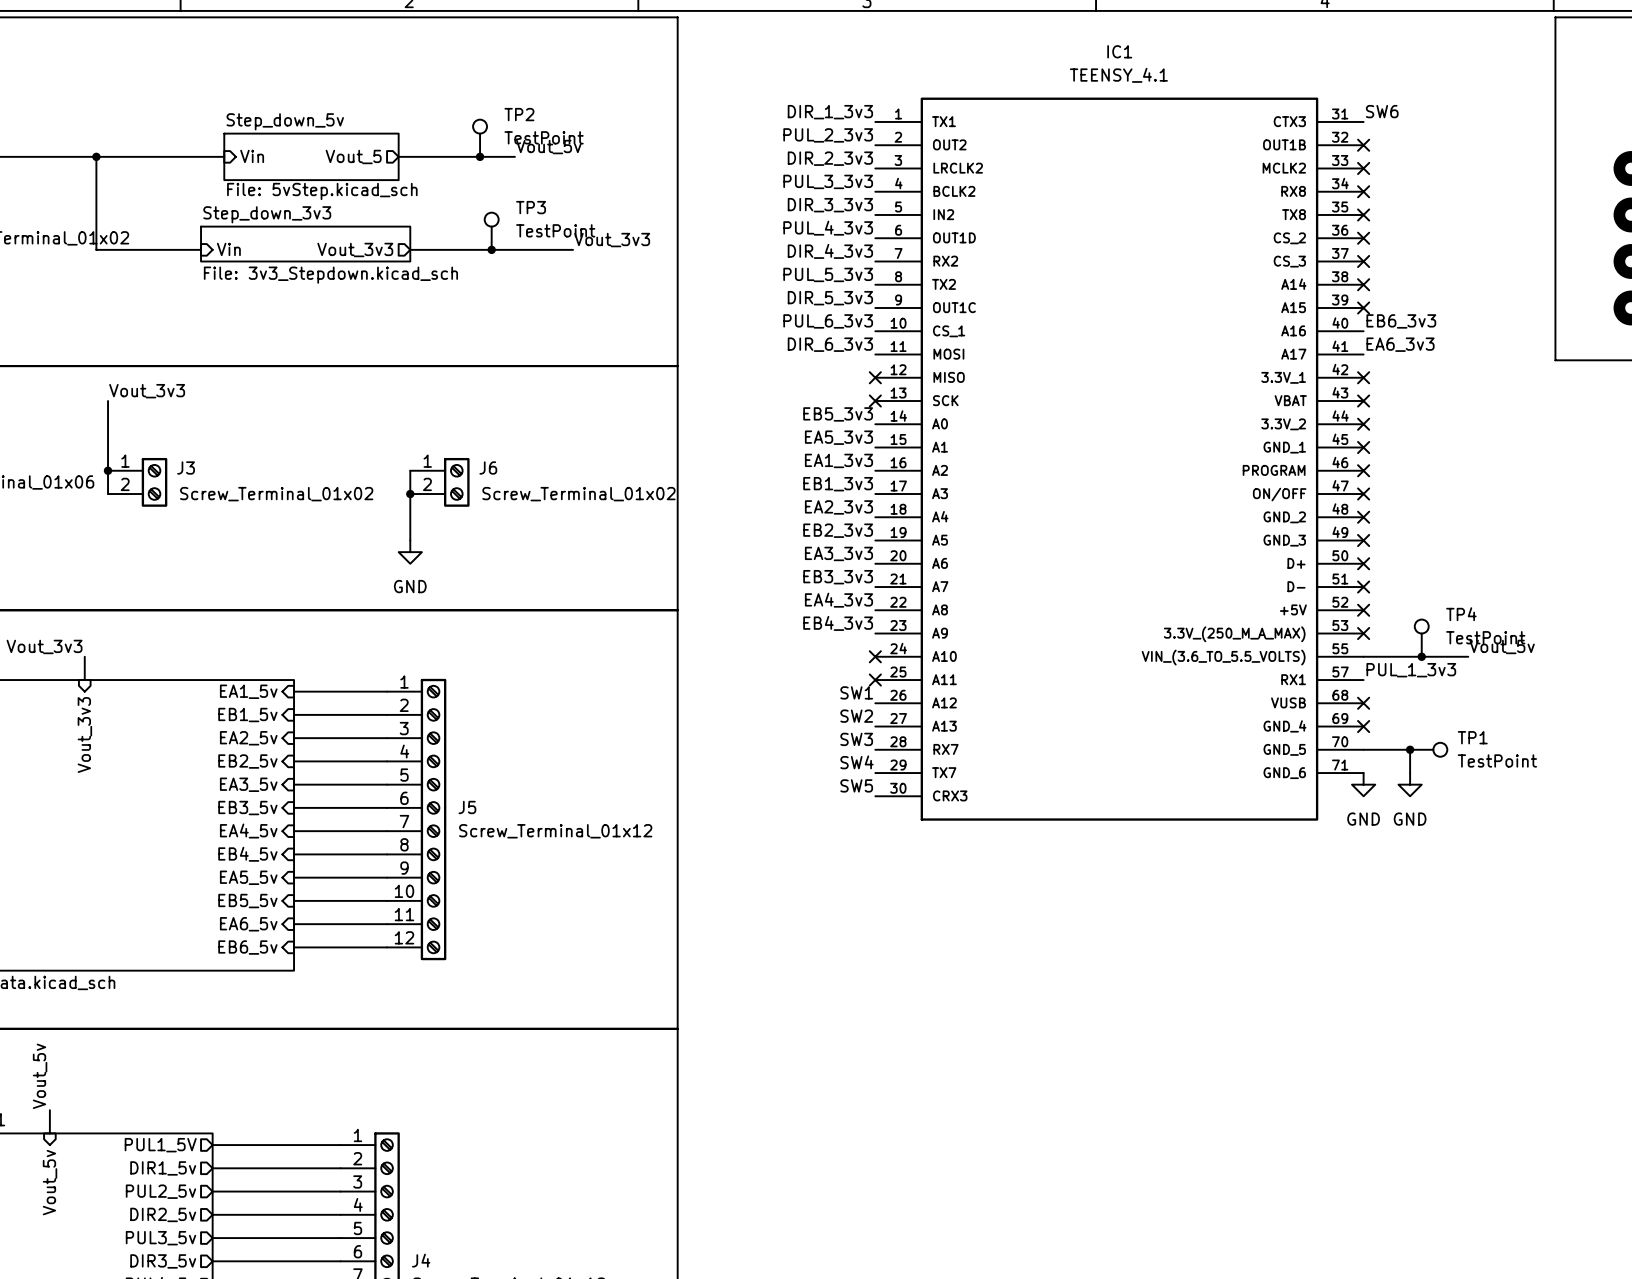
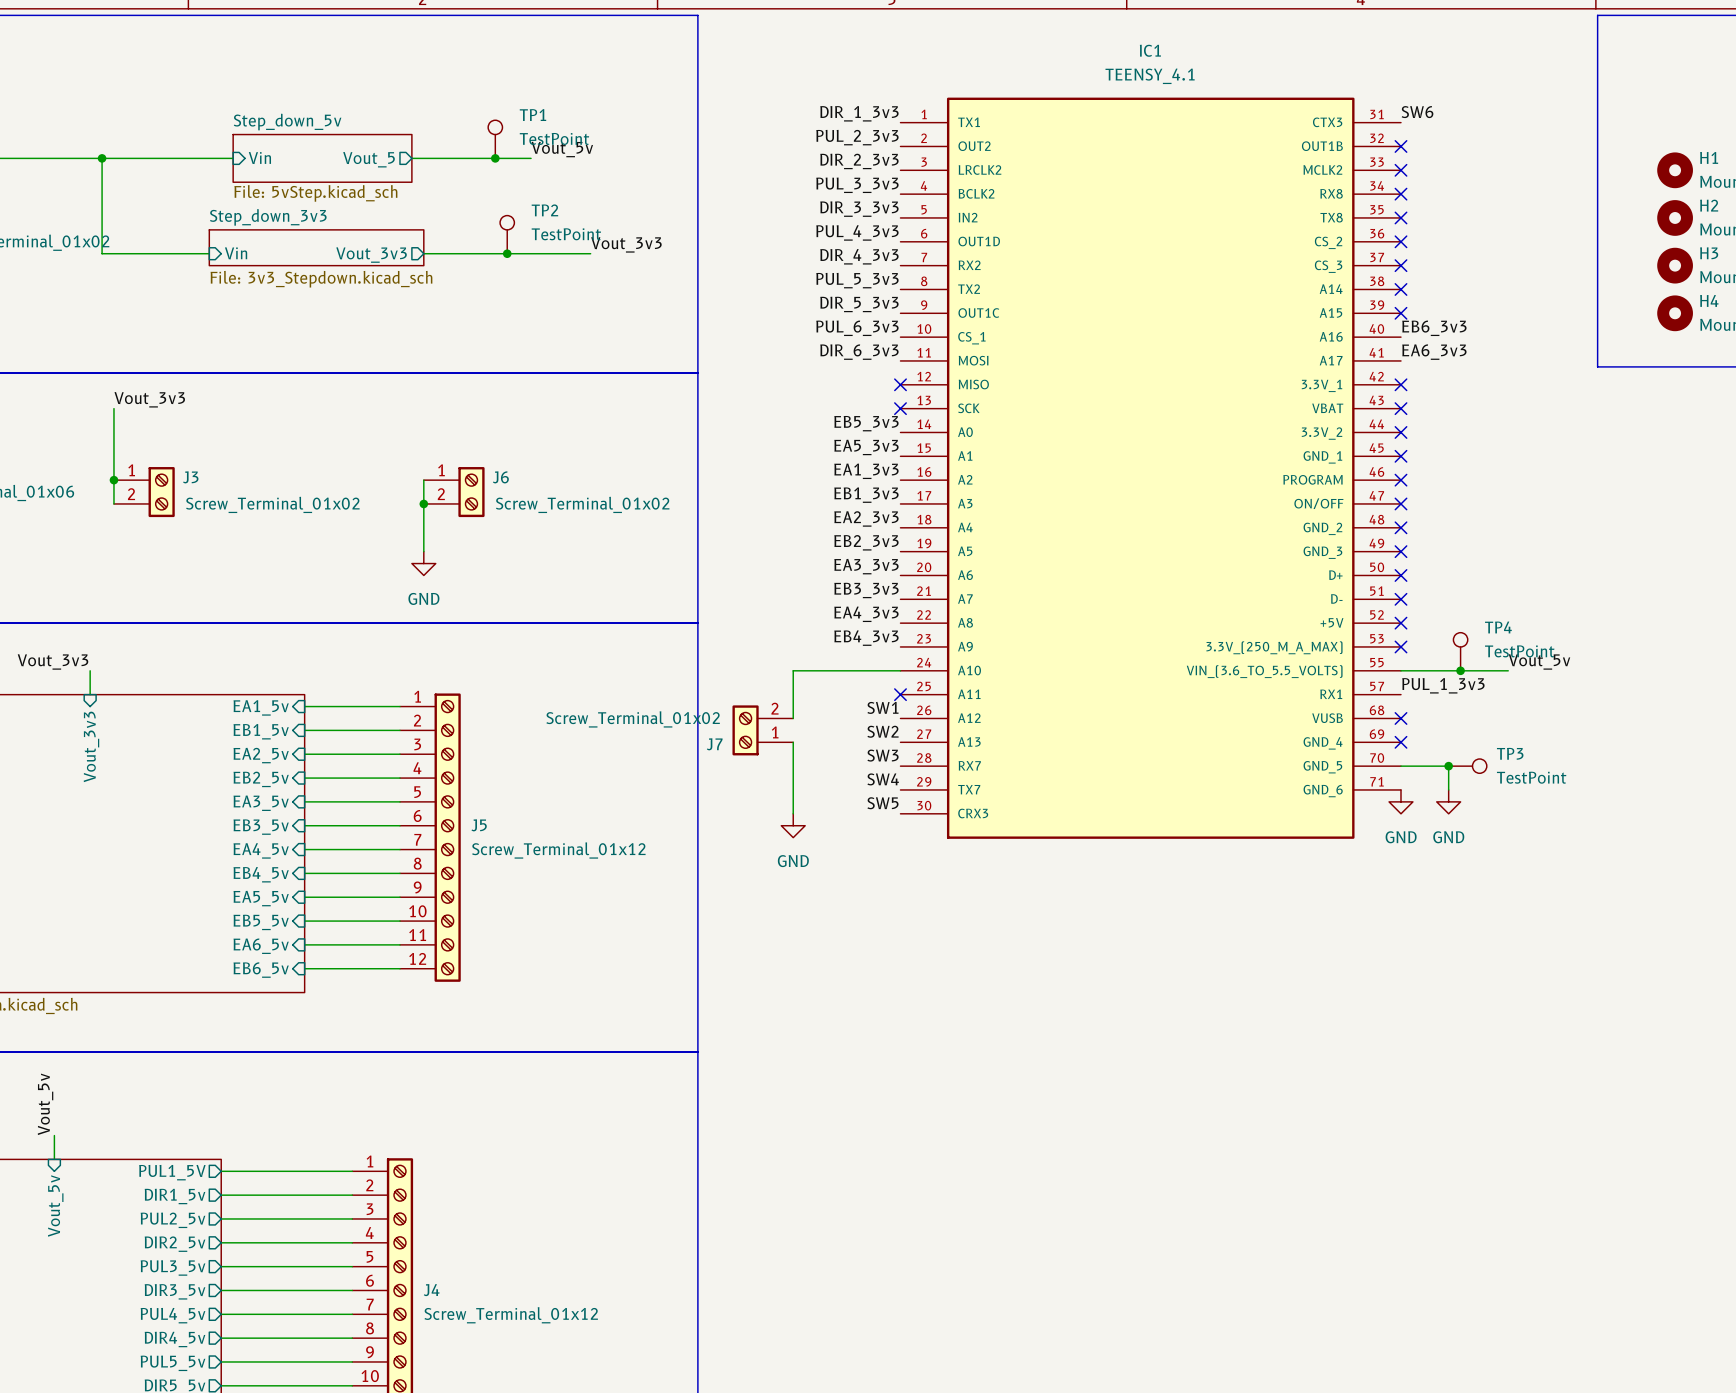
TP2 name: TP2 (519, 114) -> TP1 (532, 115)
TP3 name: TP3 (531, 207) -> TP2 (544, 210)
wire: none -> (900, 670) (793, 670) (793, 718)
no-connect mark: (875, 656) -> none
J7: none -> Screw_Terminal_01x02 (762, 730)
wire: none -> (793, 742) (793, 813)
TP1 name: TP1 (1472, 737) -> TP3 (1510, 753)
power symbol: none -> GND (793, 825)

